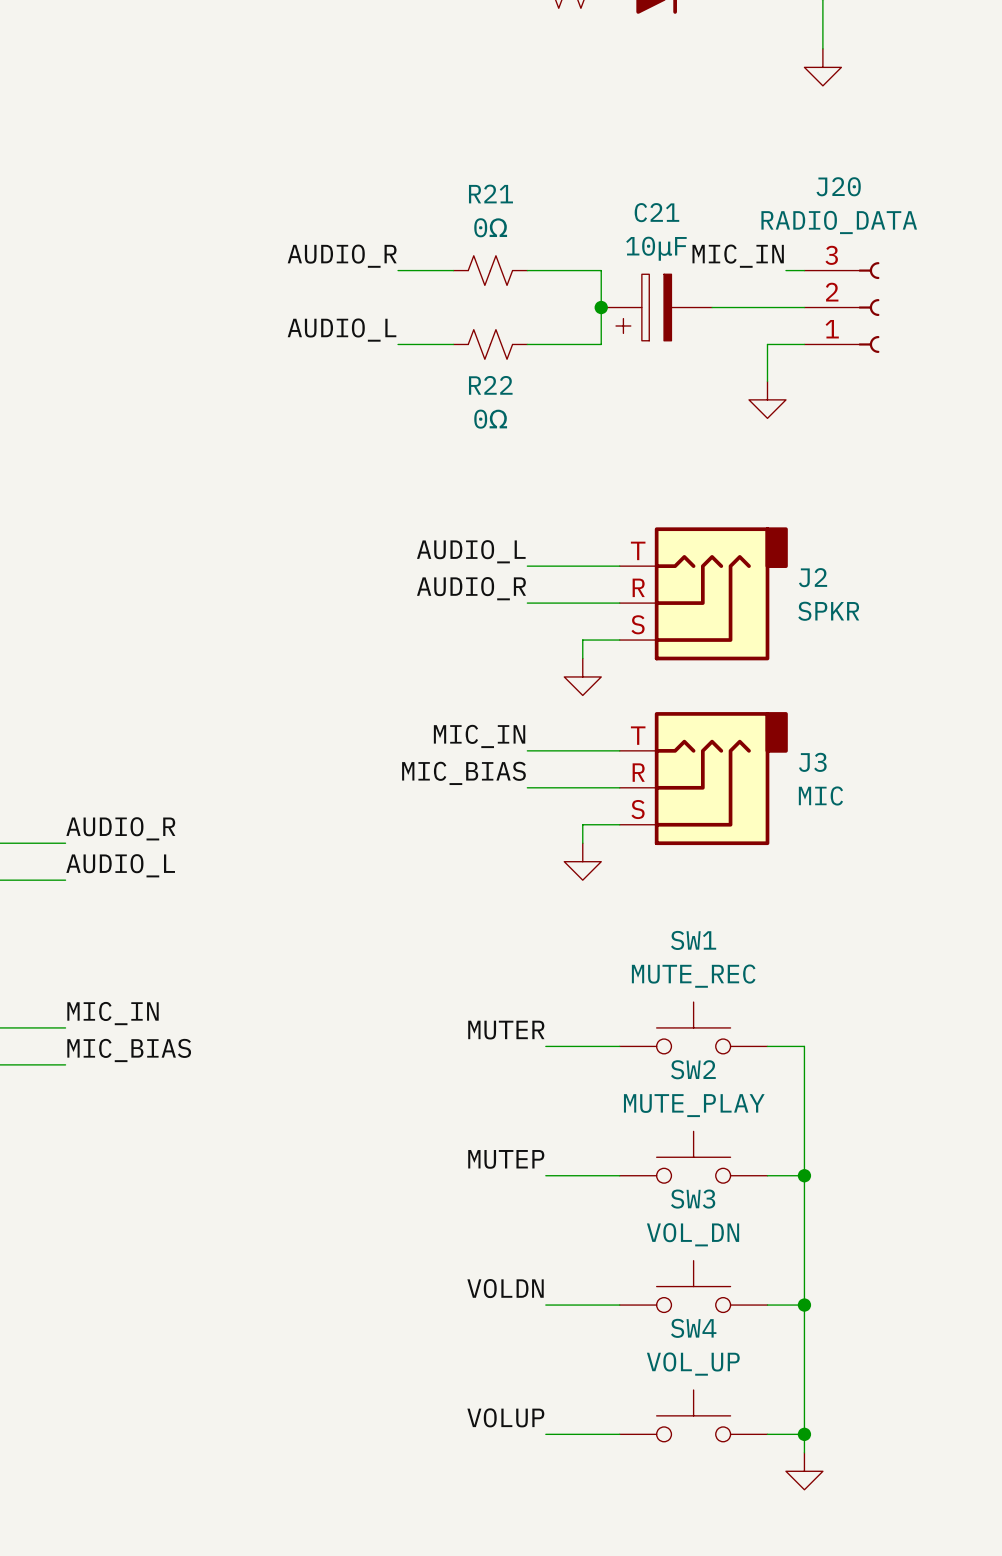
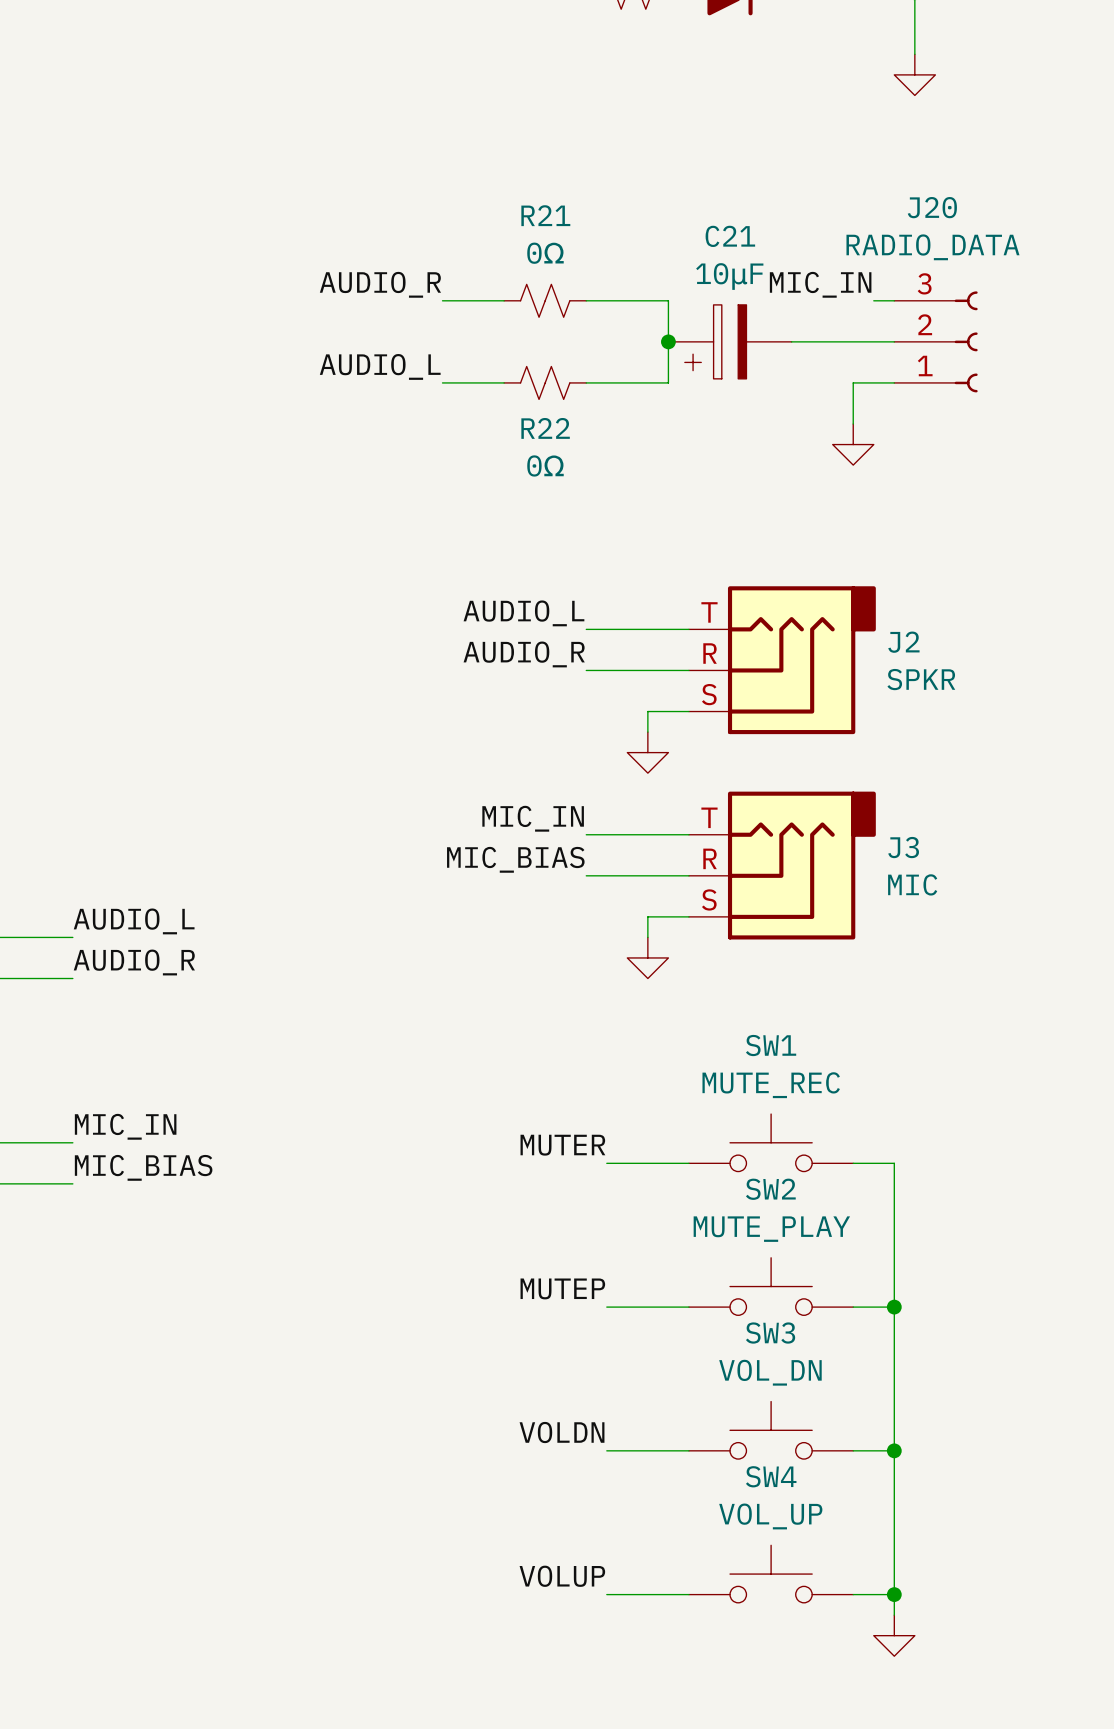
label: AUDIO_R (120, 828) -> AUDIO_L (134, 921)
label: AUDIO_L (120, 865) -> AUDIO_R (134, 962)

